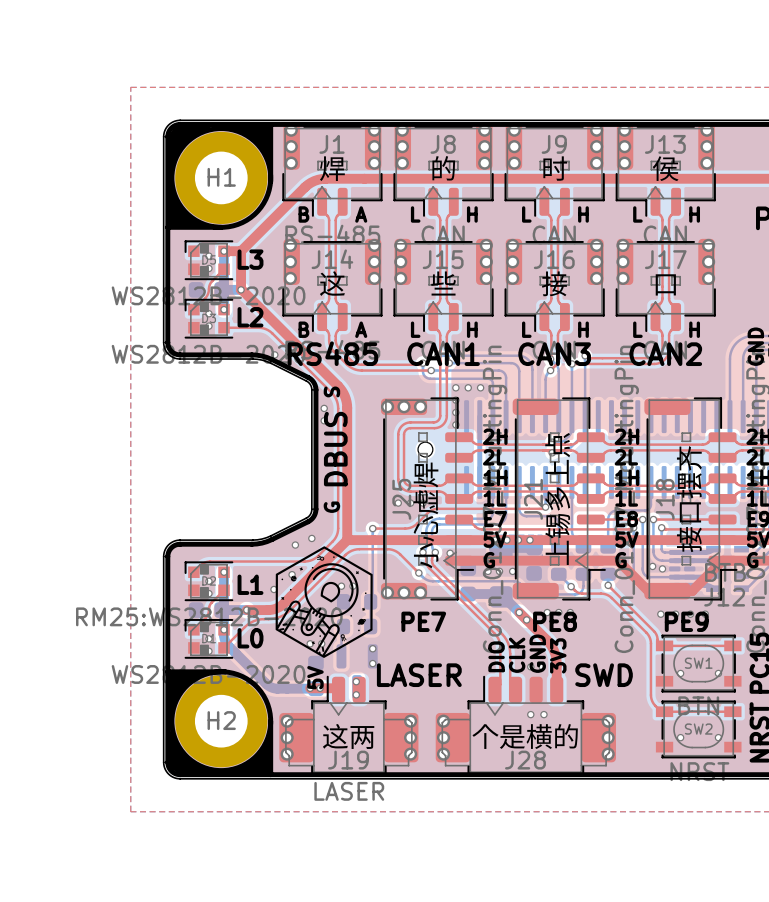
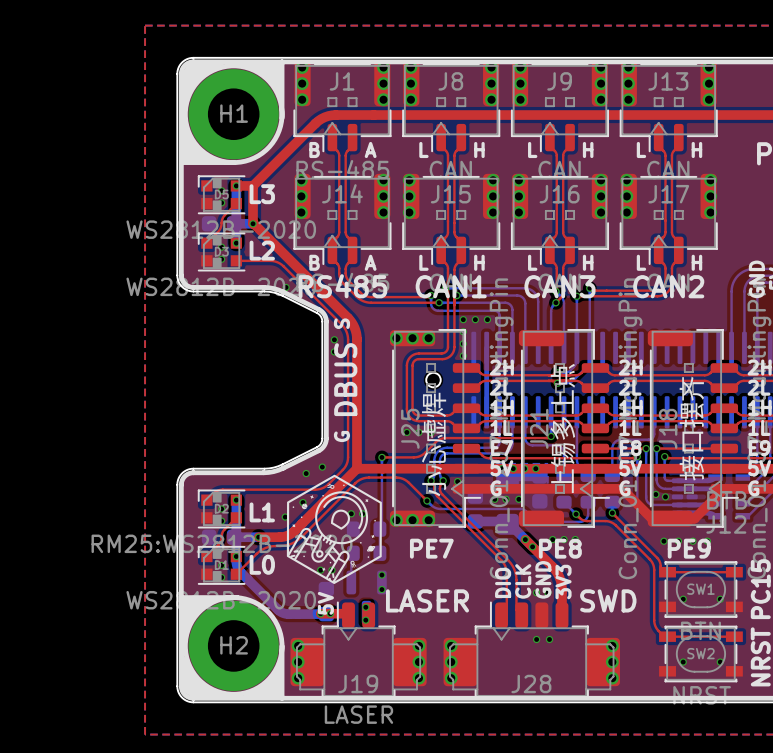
text: 焊 (332, 168) -> none
text: 的 (443, 168) -> none
text: 时 (555, 168) -> none
text: 侯 (665, 168) -> none
text: 这 (332, 283) -> none
text: 些 (443, 283) -> none
text: 接 (554, 283) -> none
text: 口 (665, 284) -> none
text: 这两 (348, 736) -> none
text: 个是横的 (525, 736) -> none

